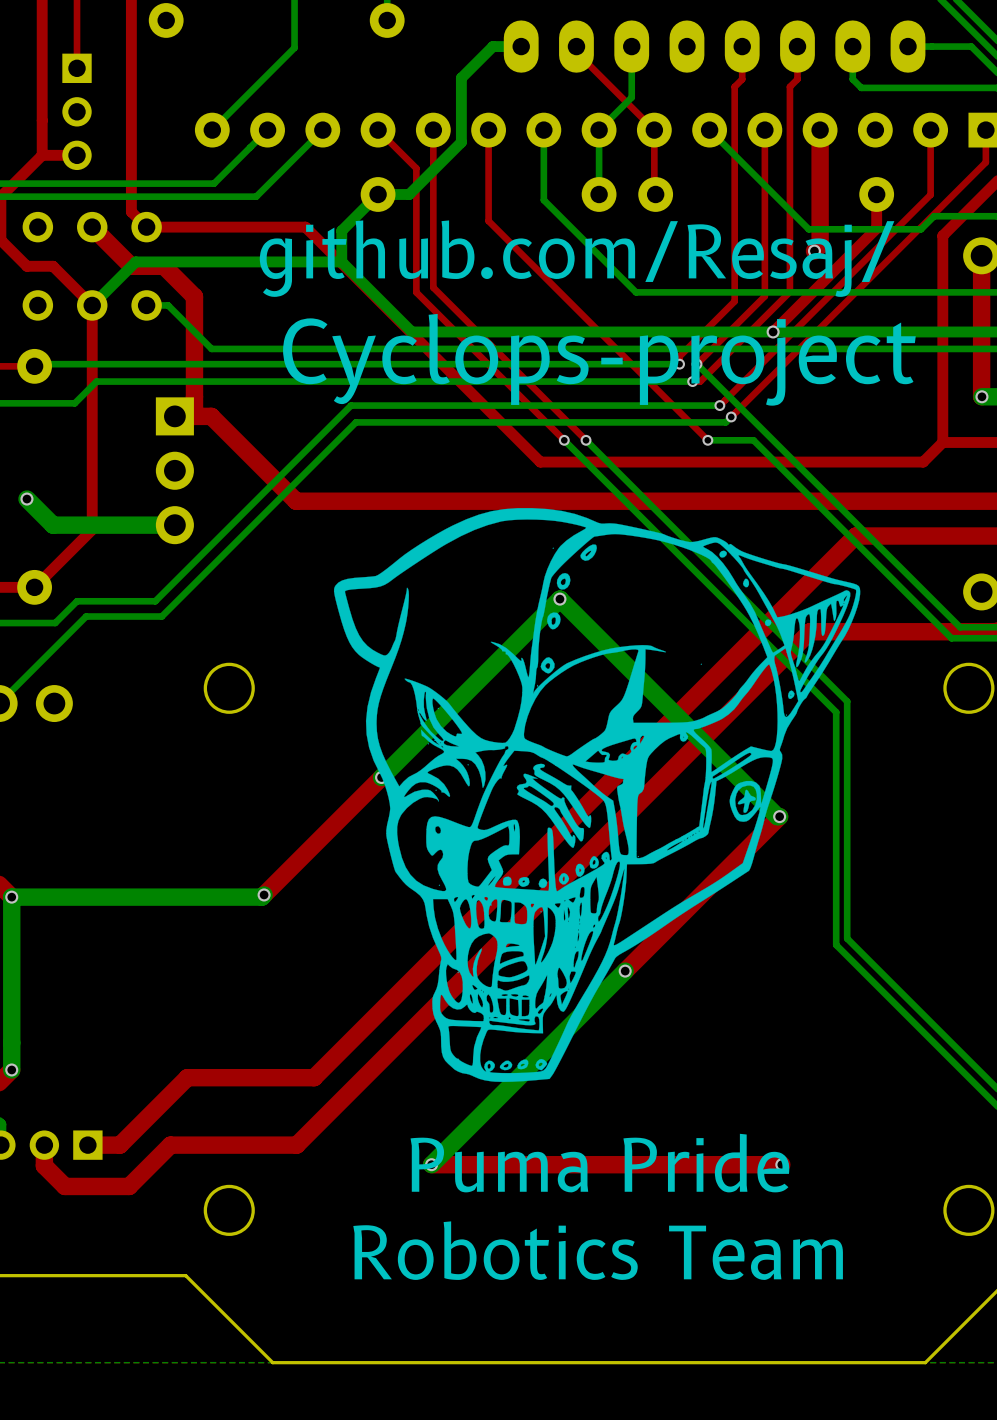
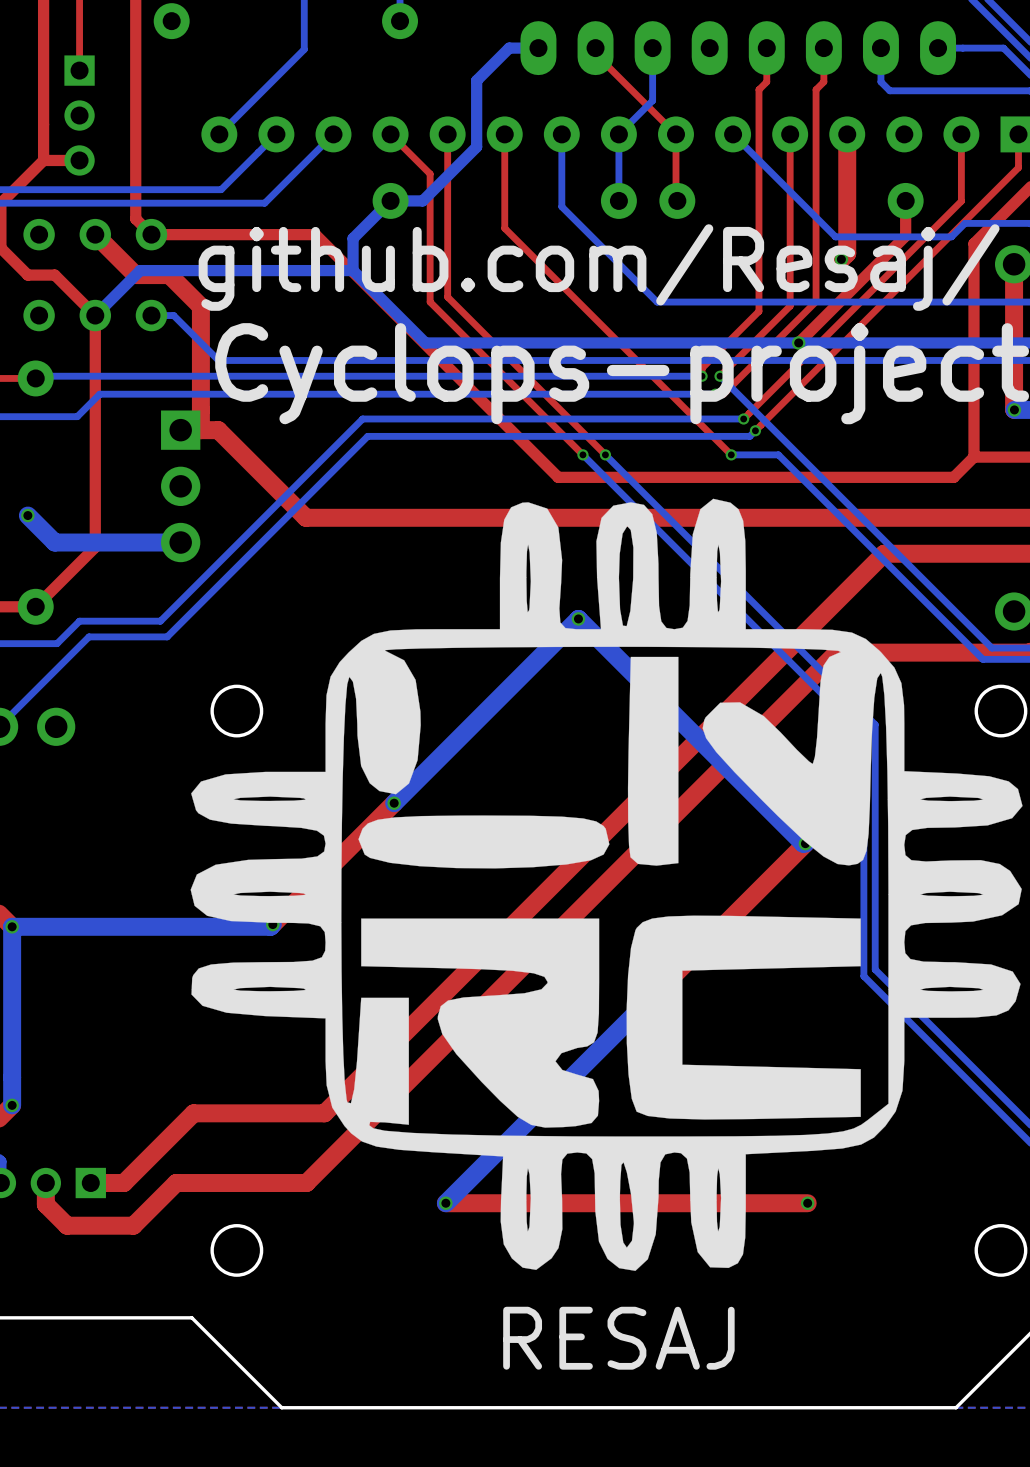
drawing: none -> [190, 498, 1023, 1271]
drawing: [333, 508, 861, 1083] -> none
text: Puma Pride (599, 1163) -> none
text: Robotics Team (598, 1250) -> none
text: none -> RESAJ (618, 1338)

